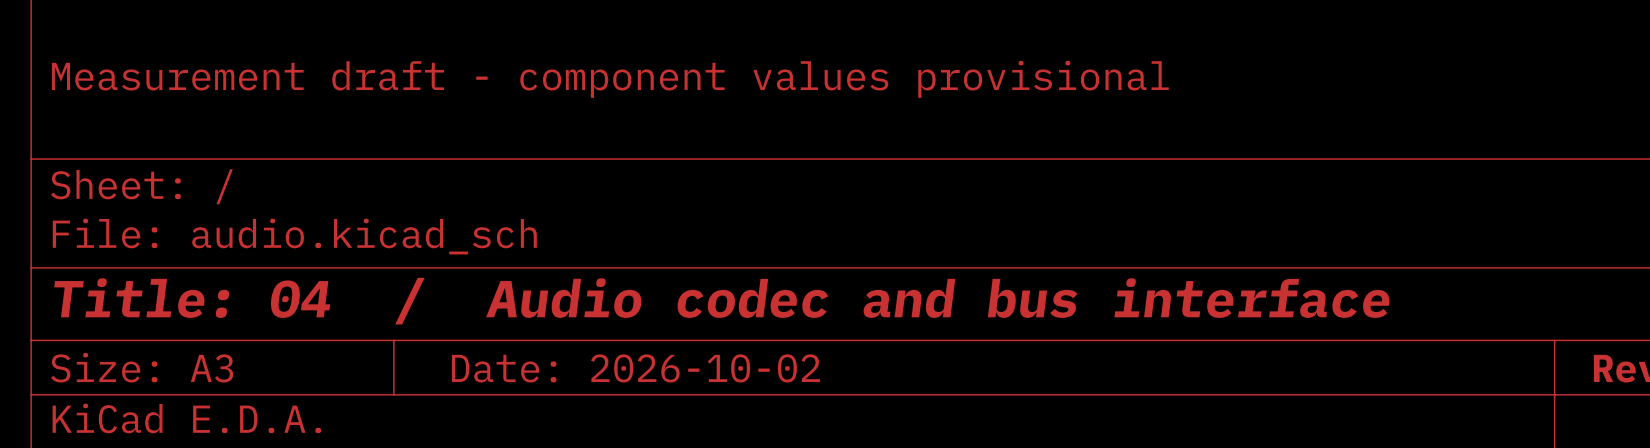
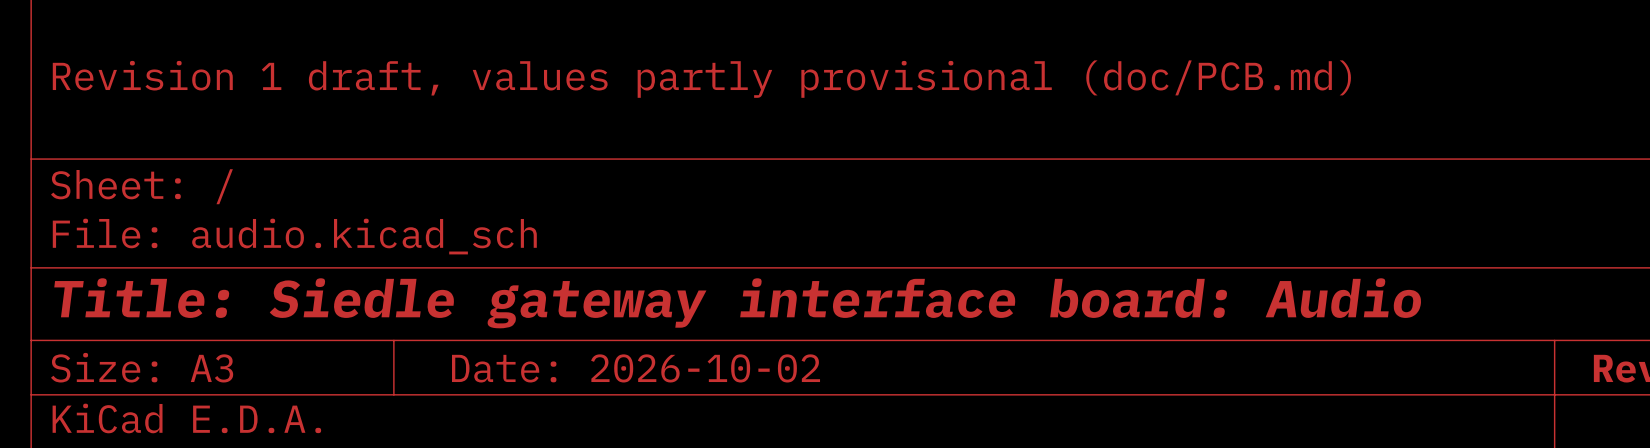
title block: Measurement draft - component values provisional (610, 79) -> Revision 1 draft, values partly provisional (doc/PCB.md) (701, 79)
title block: Title: 04 / Audio codec and bus interface (721, 301) -> Title: Siedle gateway interface board: Audio (737, 303)

